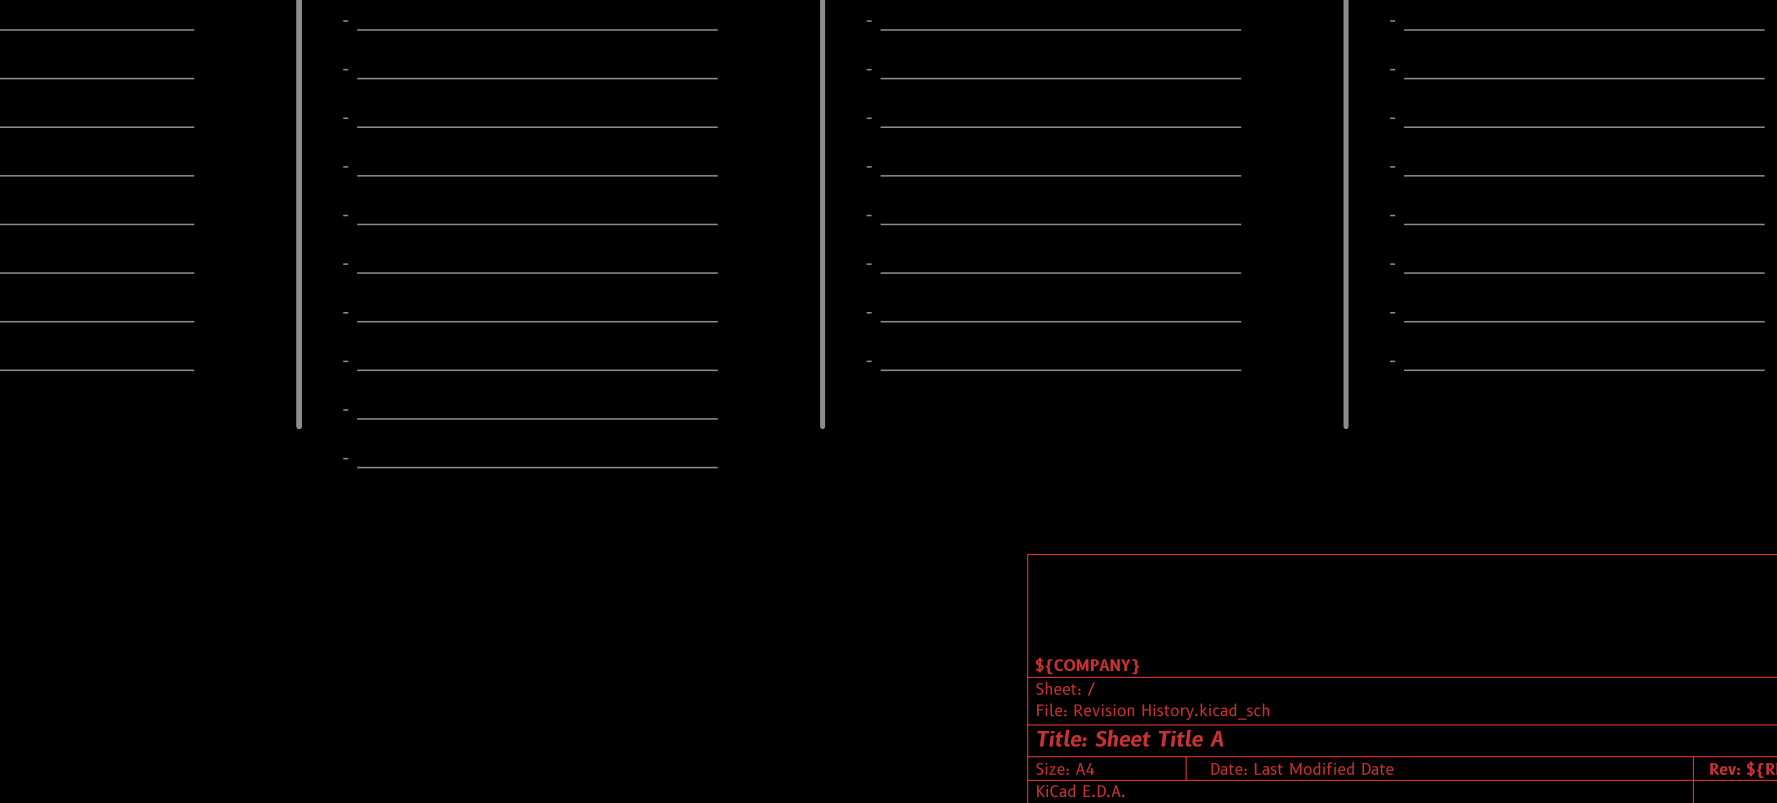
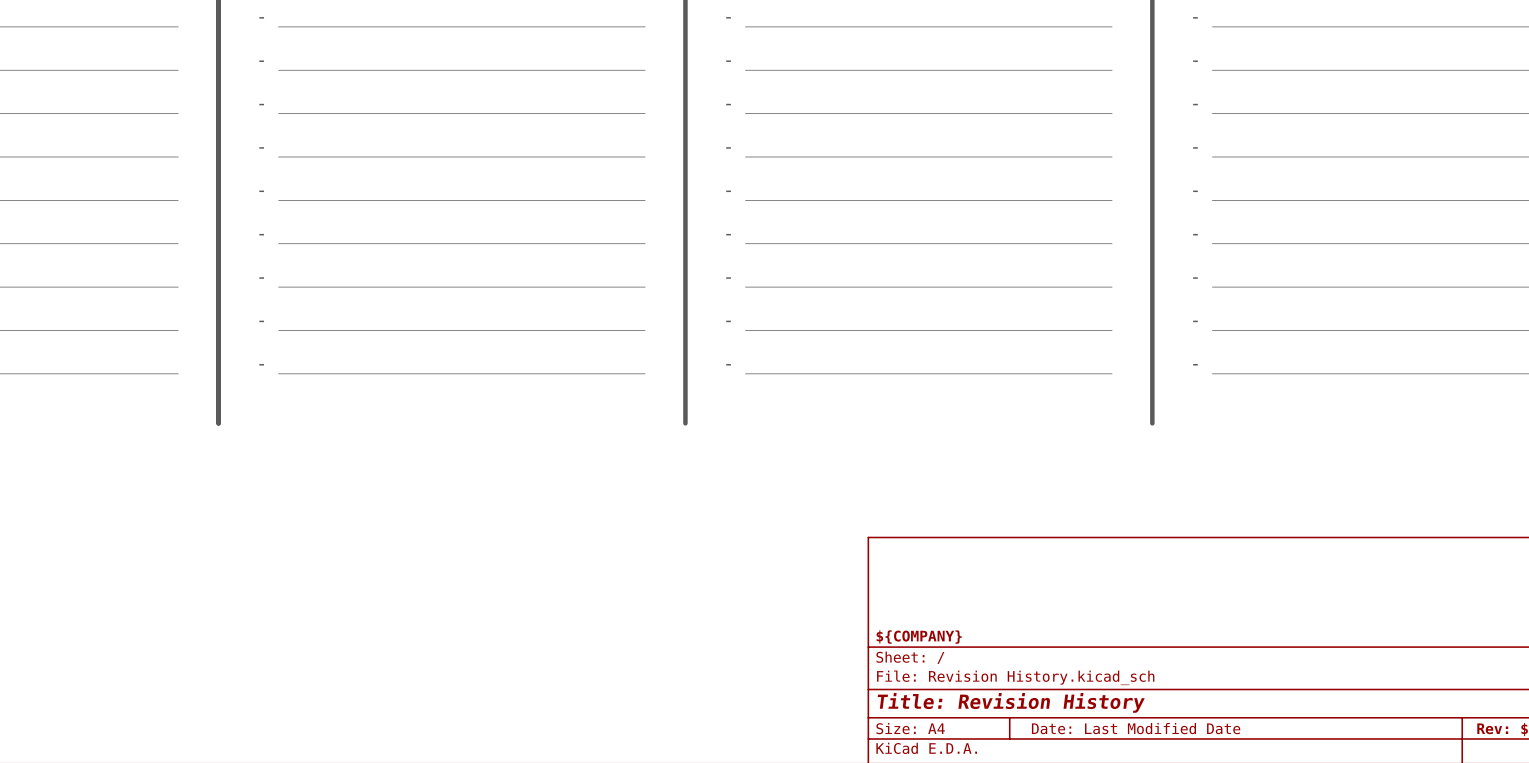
text: - _________________________________ (530, 414) -> none
text: - _________________________________ (530, 463) -> none
title block: Title: Sheet Title A (1130, 738) -> Title: Revision History (1011, 702)

